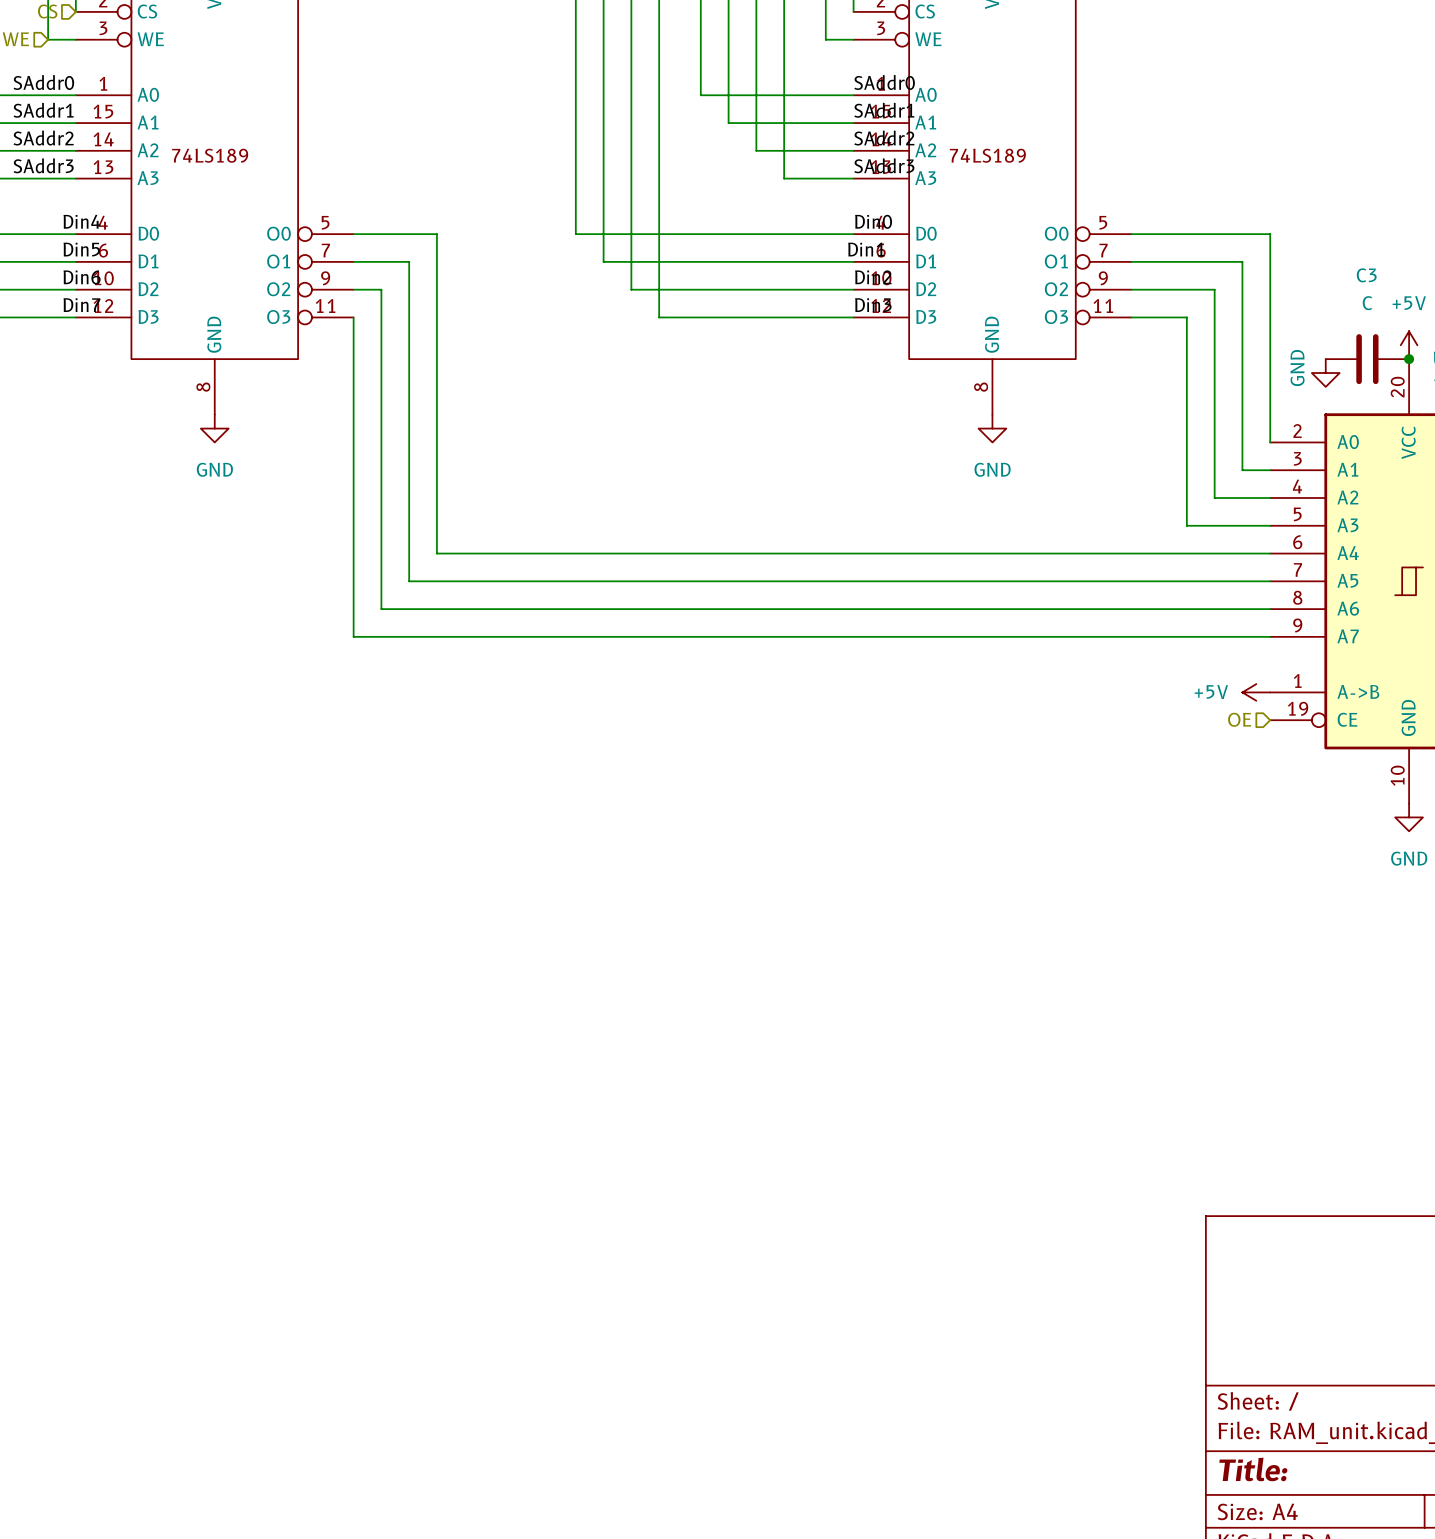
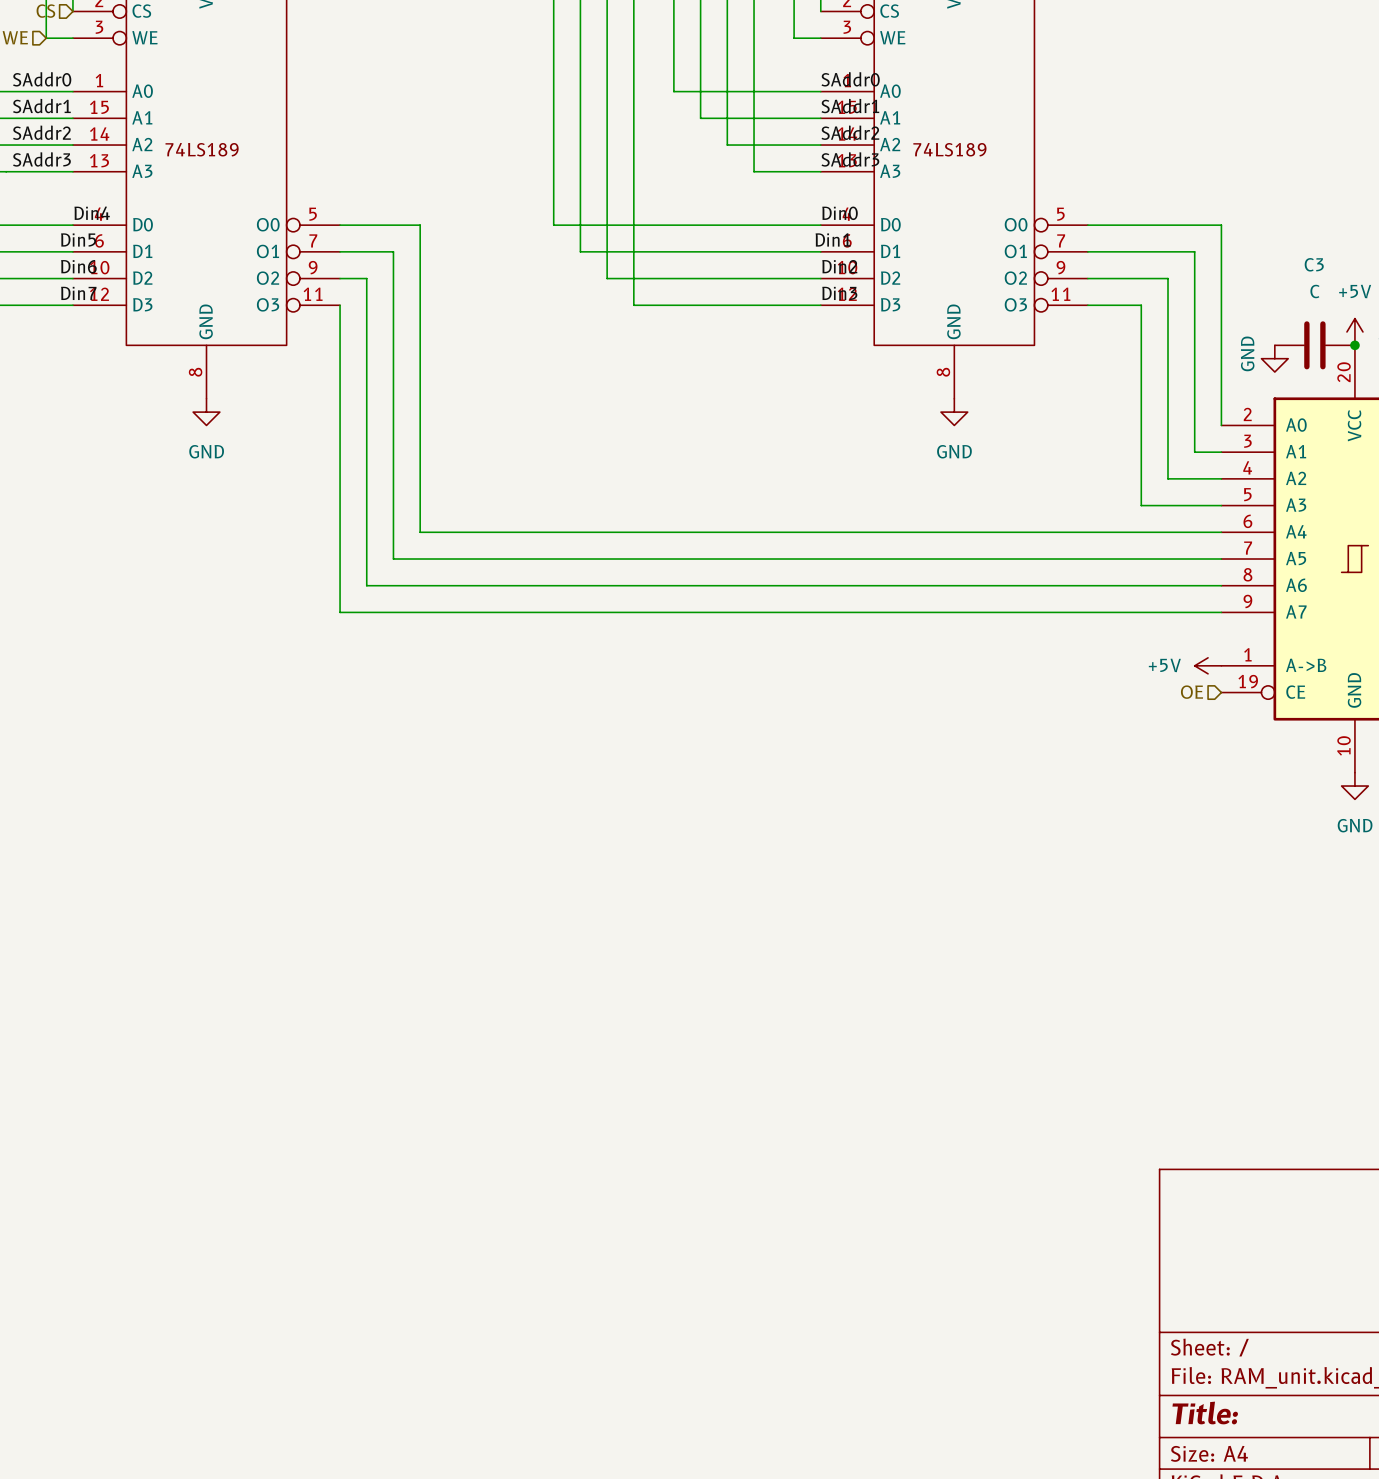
label position: Din4 (81, 221) -> Din4 (92, 213)

